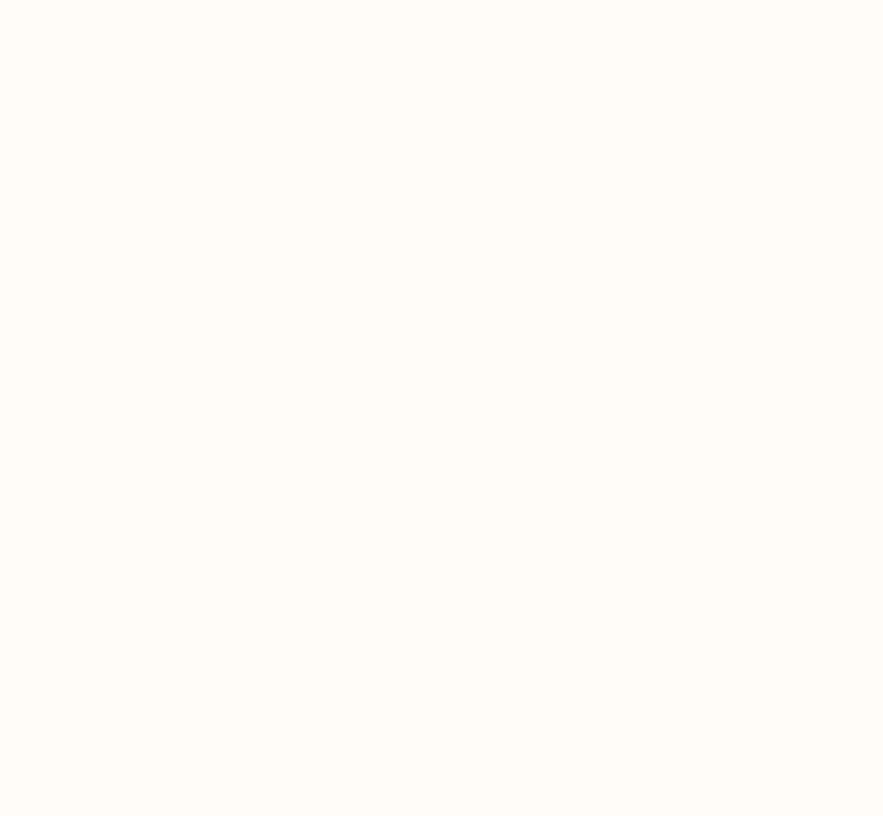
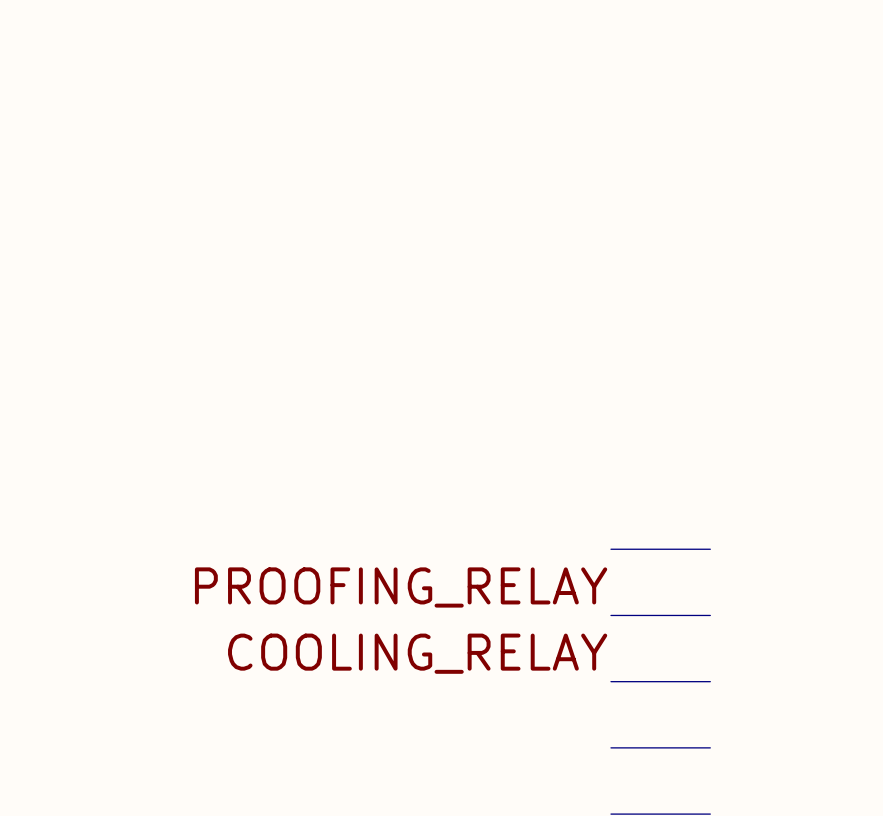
wire: none -> (610, 549) (710, 549)
label: none -> PROOFING_RELAY (401, 587)
wire: none -> (610, 615) (710, 615)
label: none -> COOLING_RELAY (417, 653)
wire: none -> (610, 681) (710, 681)
wire: none -> (610, 747) (710, 747)
wire: none -> (610, 814) (710, 814)

